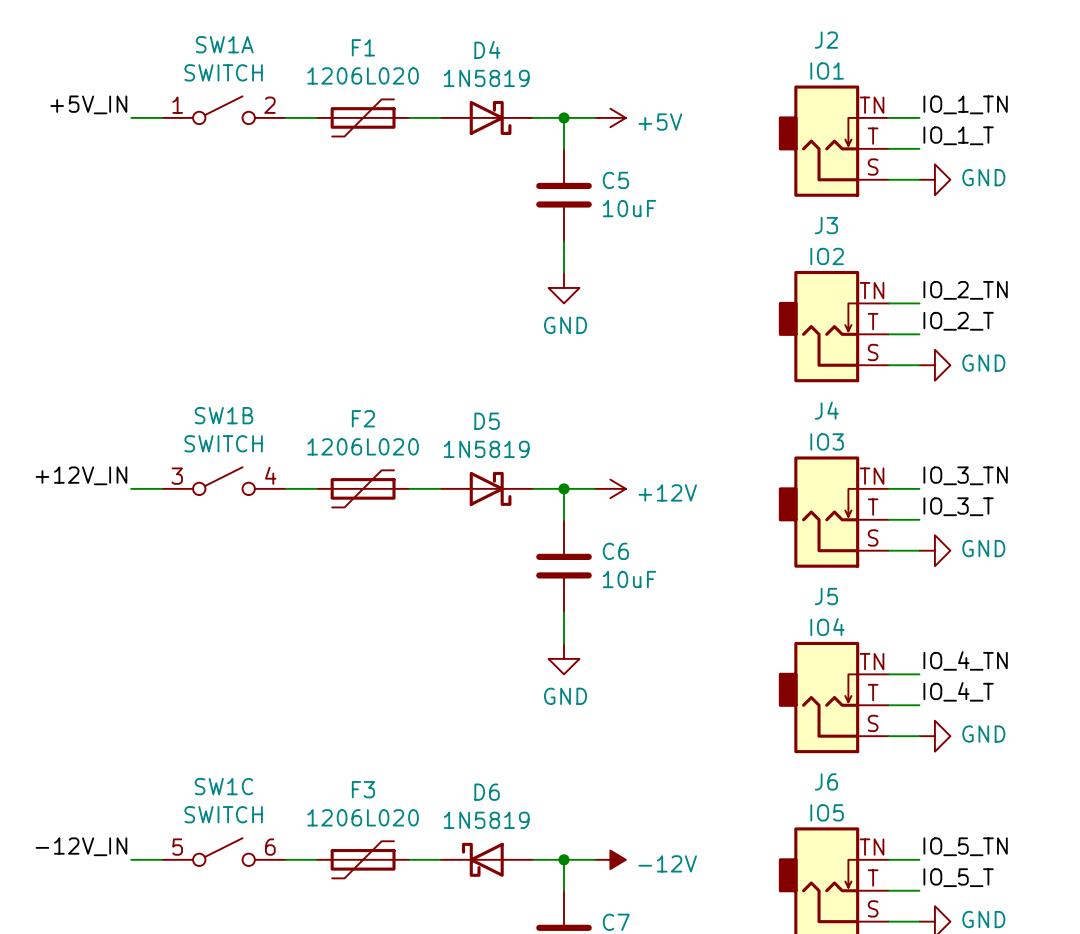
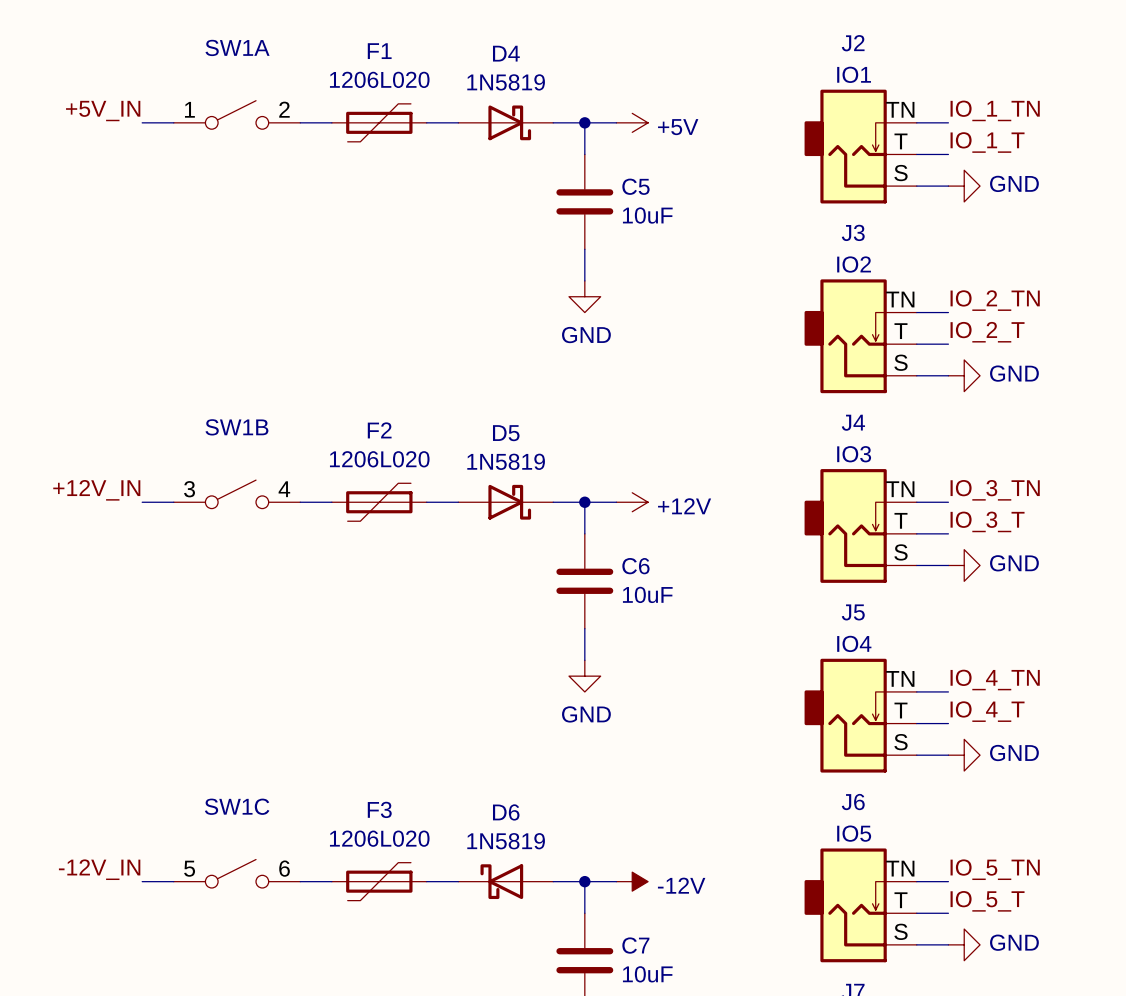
SW1A value: SWITCH (223, 72) -> none
SW1B value: SWITCH (223, 443) -> none
SW1C value: SWITCH (223, 814) -> none

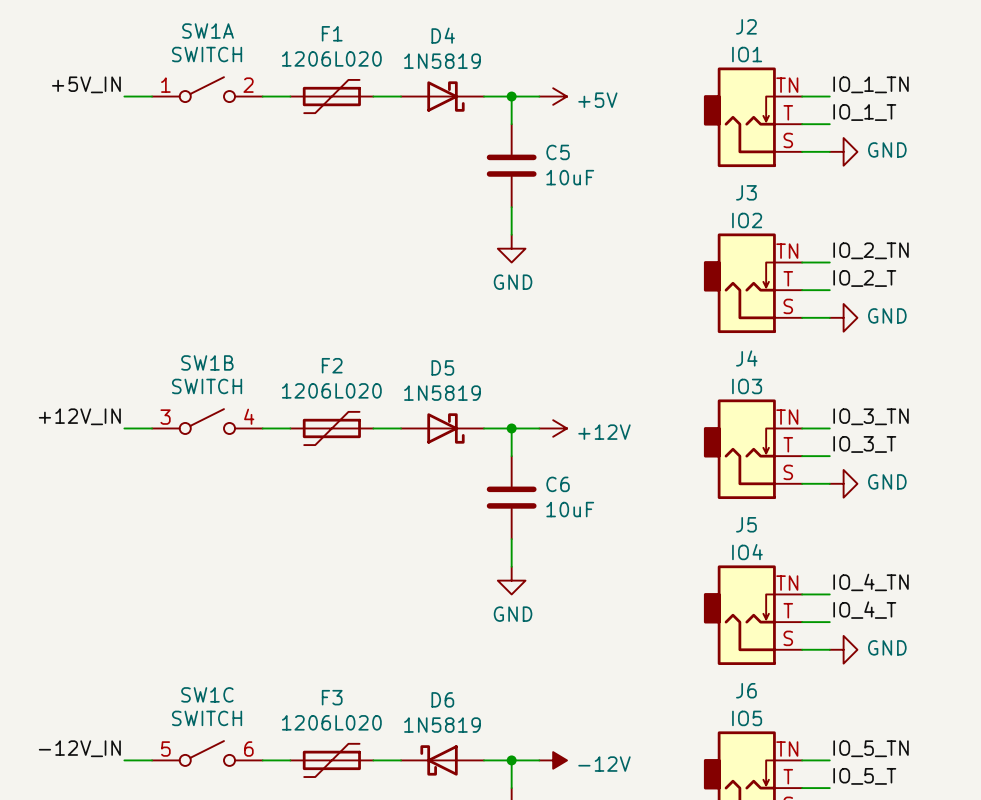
SW1A value: none -> SWITCH (207, 54)
SW1B value: none -> SWITCH (207, 386)
SW1C value: none -> SWITCH (207, 718)

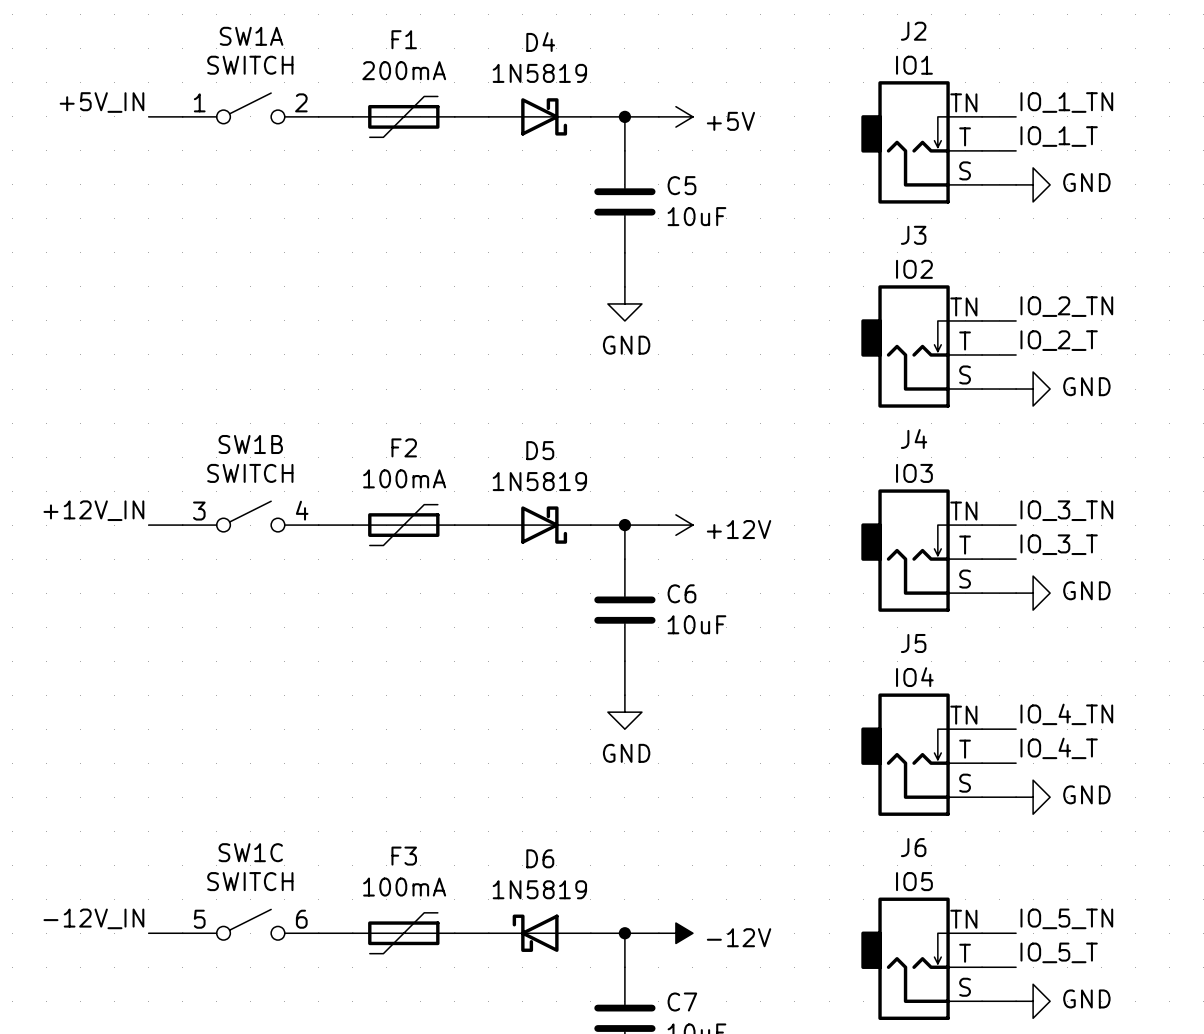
F1 value: 1206L020 (331, 58) -> 200mA (404, 70)
F2 value: 1206L020 (331, 390) -> 100mA (404, 478)
F3 value: 1206L020 (331, 722) -> 100mA (404, 887)

